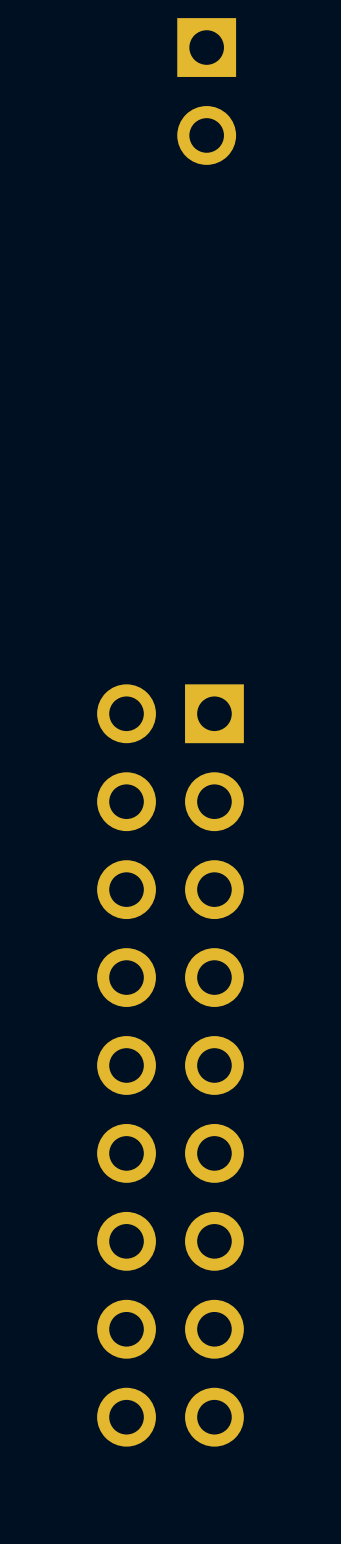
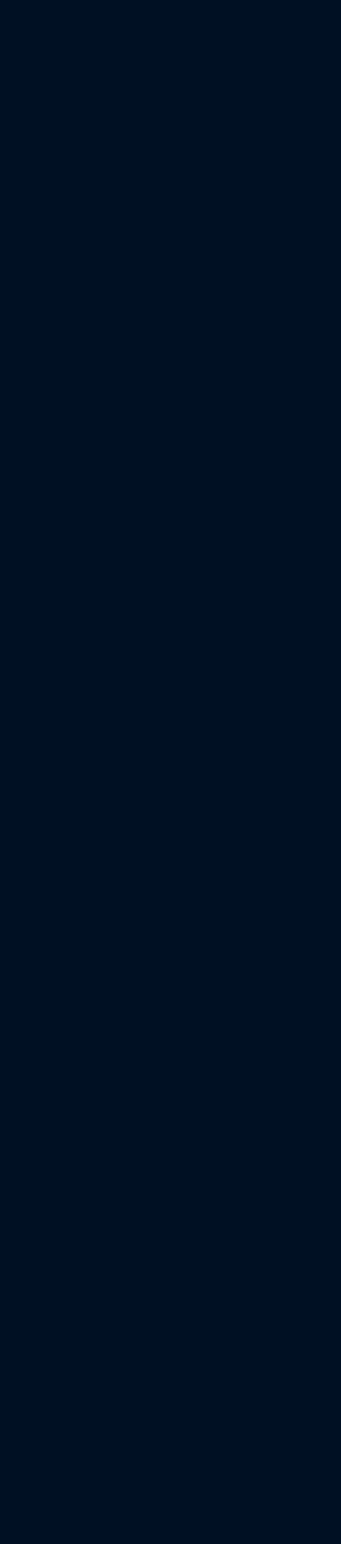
part: (206, 91) -> none
part: (170, 1065) -> none

